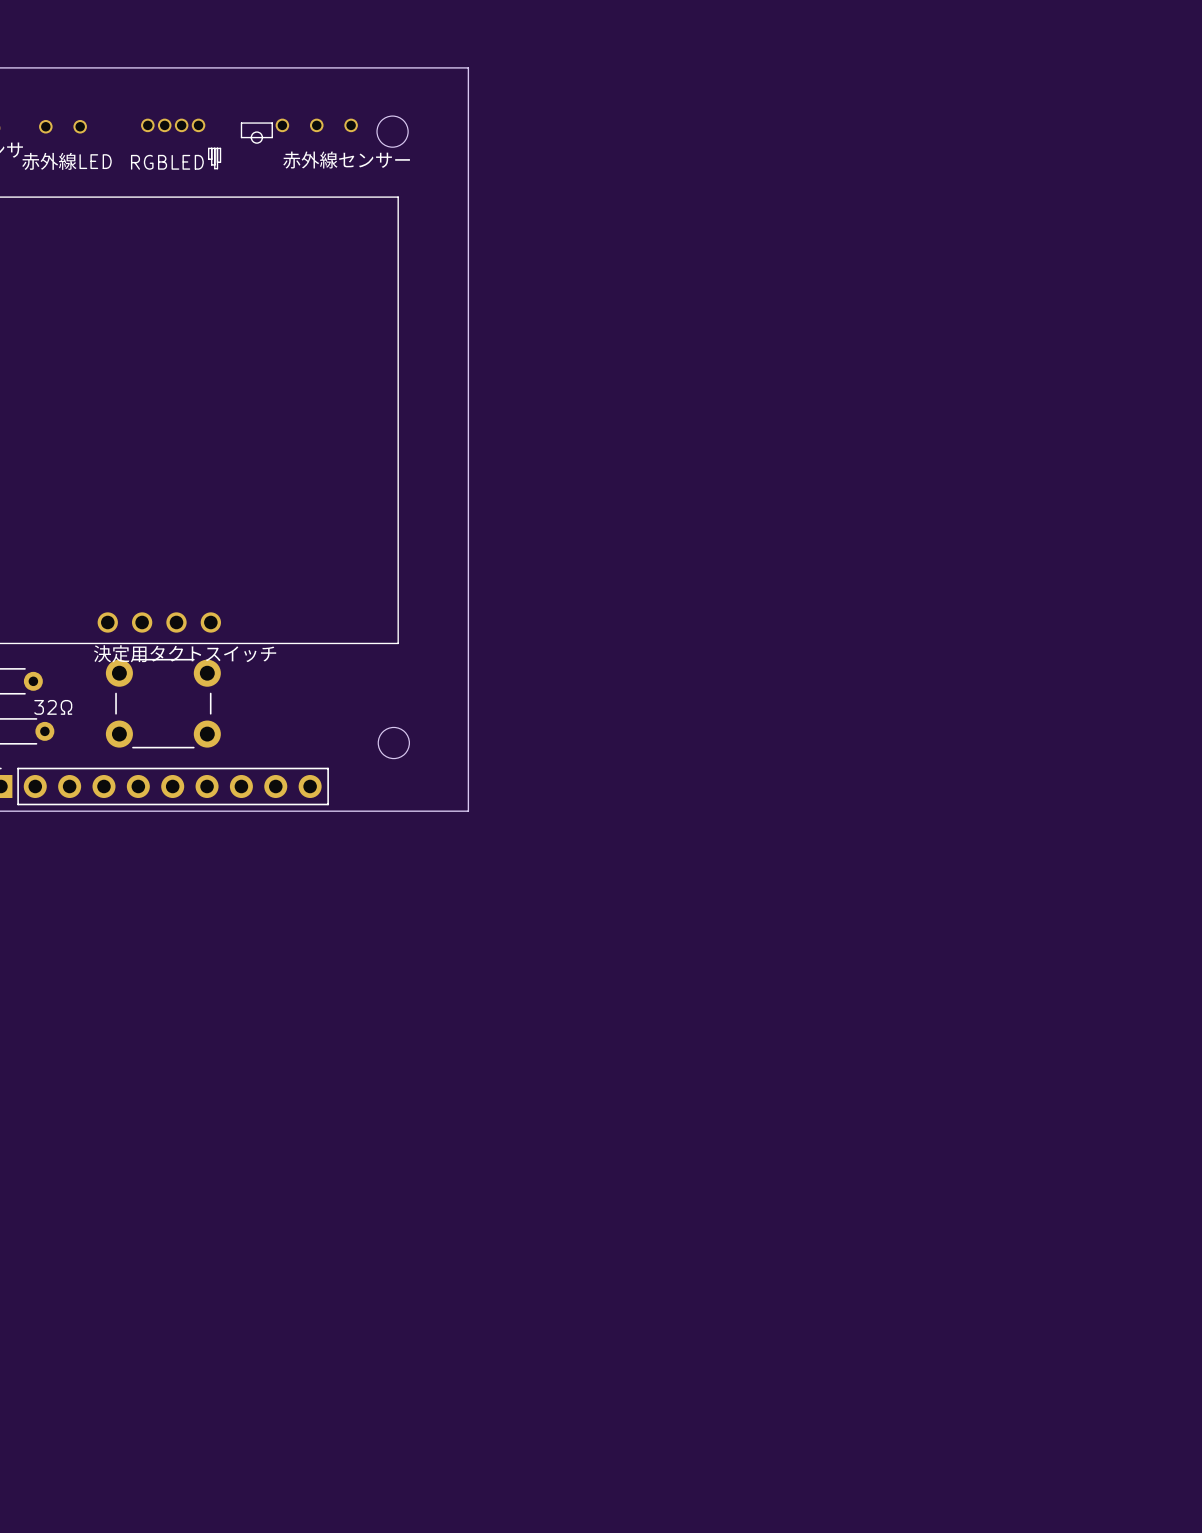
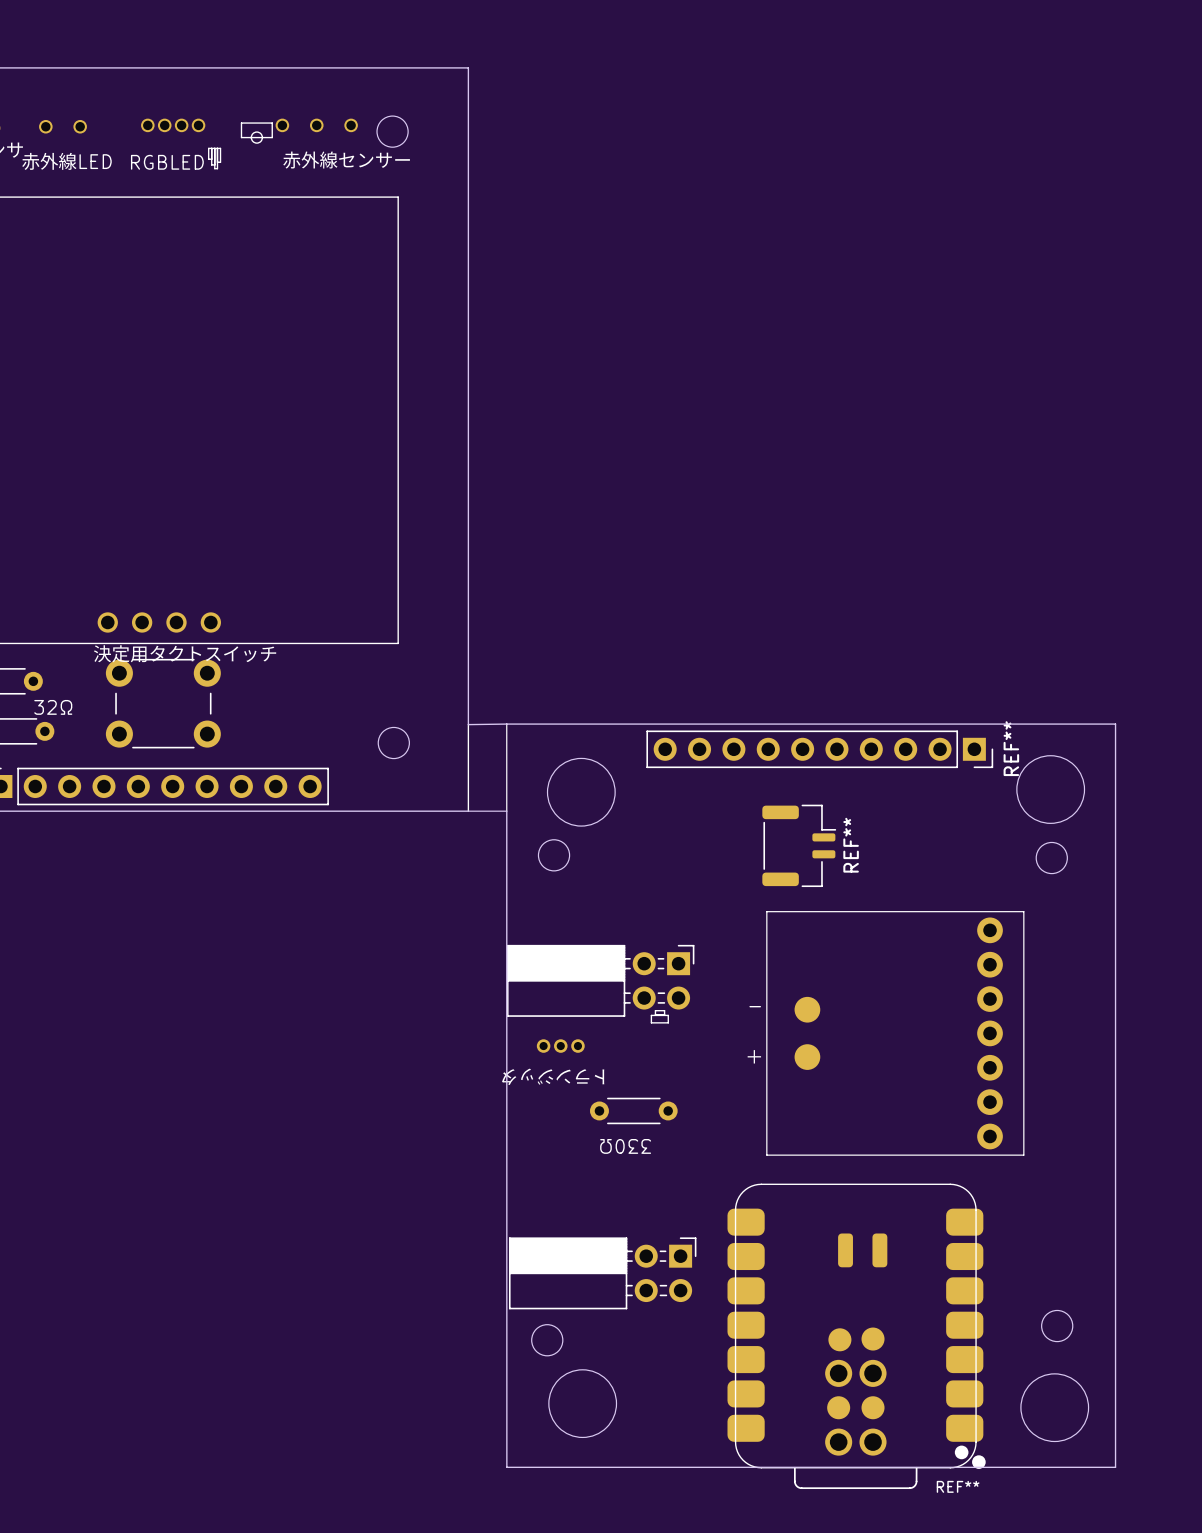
line: none -> (468, 724) (468, 811)
board edge: (468, 724) (468, 811) -> (468, 724) (1115, 724) (1115, 1467) (506, 1467) (506, 811) (468, 811)
line: none -> (506, 724) (506, 811)
REF**: none -> (819, 749)
round board edge: none -> [1016, 755, 1085, 824]
round board edge: none -> [547, 758, 616, 827]
round board edge: none -> [538, 839, 570, 872]
round board edge: none -> [1035, 842, 1068, 874]
REF**: none -> (799, 845)
line: none -> (766, 911) (1023, 911) (1023, 1155) (766, 1155) (766, 911)
part: none -> (990, 930)
part: none -> (990, 964)
part: none -> (600, 980)
part: none -> (990, 999)
text: none -> - (755, 1006)
part: none -> (807, 1009)
line: none -> (655, 1010) (664, 1010) (664, 1014) (655, 1014) (655, 1010)
line: none -> (651, 1015) (668, 1015) (668, 1022) (651, 1022) (651, 1015)
part: none -> (990, 1033)
part: none -> (543, 1046)
part: none -> (560, 1046)
part: none -> (577, 1046)
text: none -> ＋ (754, 1056)
part: none -> (807, 1057)
part: none -> (990, 1067)
text: none -> トランジッタ (553, 1076)
part: none -> (990, 1102)
part: none -> (633, 1110)
part: none -> (990, 1136)
text: none -> 330Ω (625, 1146)
part: none -> (602, 1273)
round board edge: none -> [1041, 1310, 1074, 1342]
round board edge: none -> [531, 1324, 564, 1357]
REF**: none -> (856, 1336)
round board edge: none -> [548, 1369, 617, 1438]
round board edge: none -> [1020, 1373, 1089, 1442]

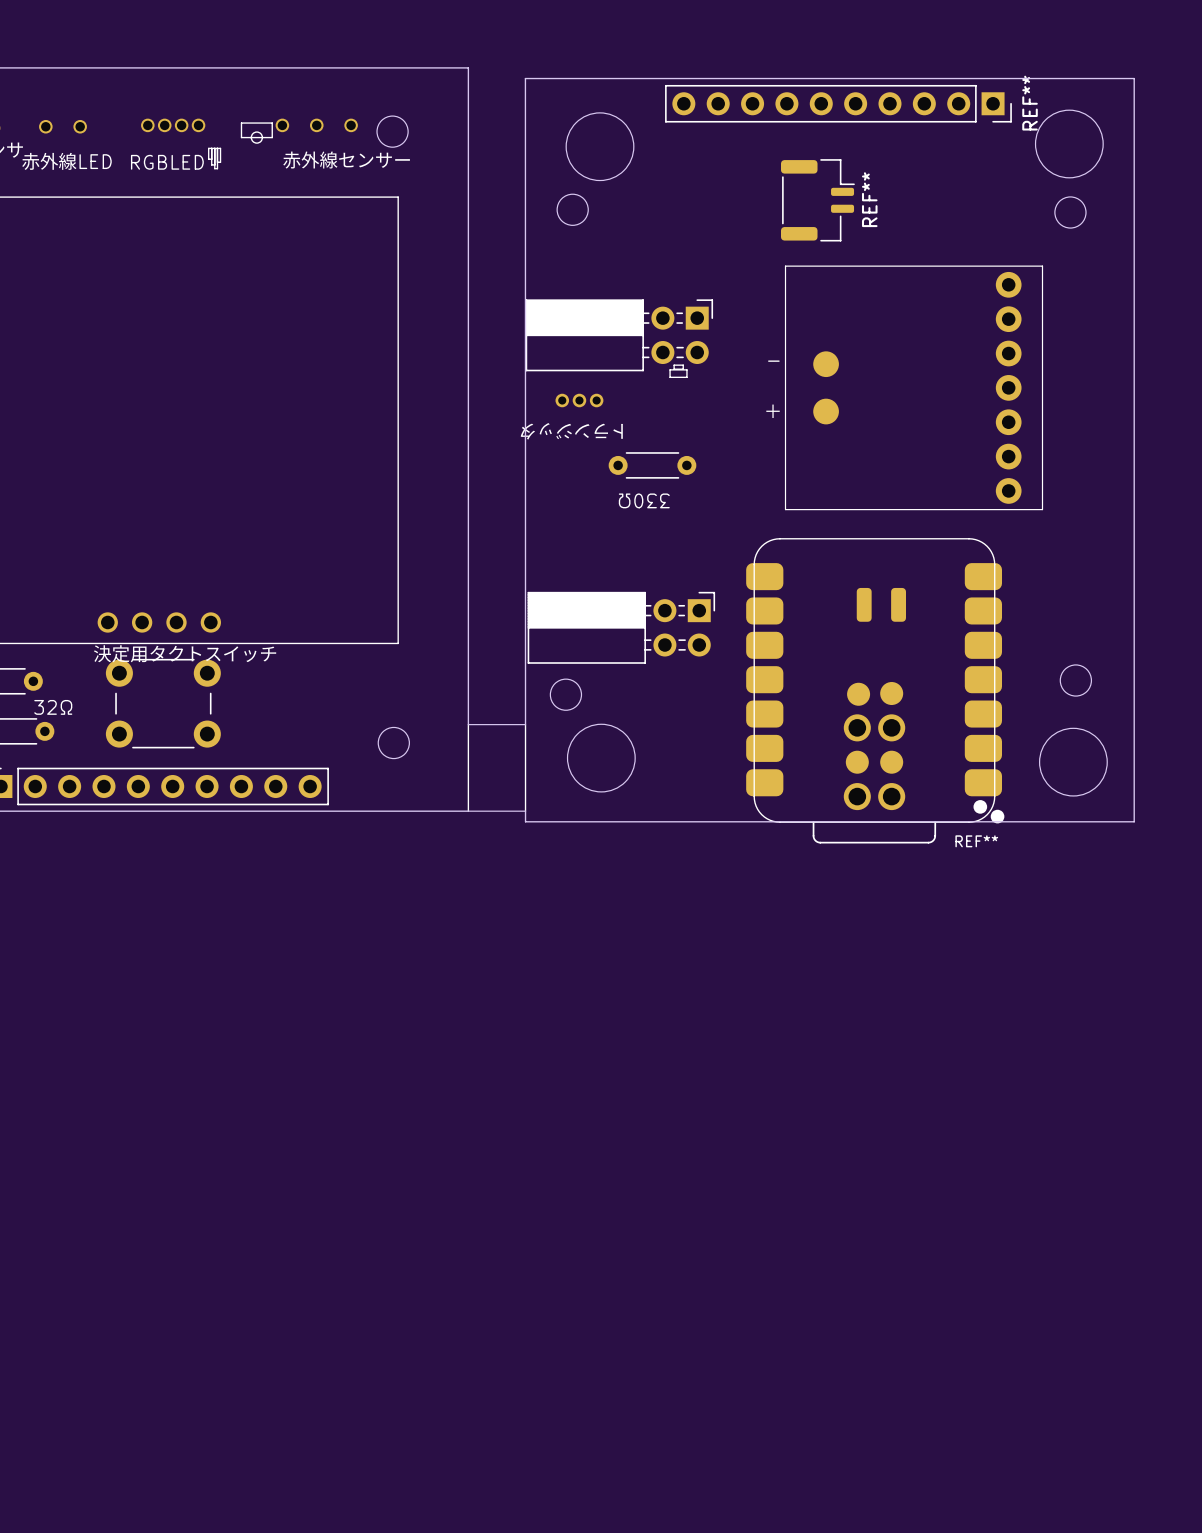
REF**: none -> (838, 103)
round board edge: none -> [1035, 109, 1104, 179]
round board edge: none -> [565, 112, 635, 181]
round board edge: none -> [556, 193, 589, 226]
round board edge: none -> [1054, 196, 1087, 229]
REF**: none -> (817, 200)
line: none -> (785, 266) (1042, 266) (1042, 509) (785, 509) (785, 266)
part: none -> (1008, 284)
part: none -> (1008, 319)
part: none -> (619, 335)
part: none -> (1008, 353)
text: none -> - (773, 361)
part: none -> (826, 364)
line: none -> (674, 365) (683, 365) (683, 369) (674, 369) (674, 365)
line: none -> (670, 369) (686, 369) (686, 377) (670, 377) (670, 369)
part: none -> (1008, 387)
part: none -> (562, 400)
part: none -> (579, 400)
part: none -> (596, 400)
text: none -> ＋ (773, 411)
part: none -> (826, 411)
part: none -> (1008, 422)
text: none -> トランジッタ (571, 431)
part: none -> (1008, 456)
part: none -> (652, 465)
part: none -> (1008, 490)
text: none -> 330Ω (644, 500)
part: none -> (621, 627)
REF**: none -> (875, 690)
board edge: (468, 724) (1115, 724) (1115, 1467) (506, 1467) (506, 811) -> (468, 724) (525, 724) (525, 78) (1134, 78) (1134, 821) (525, 821) (525, 811) (506, 811)
line: (506, 724) (506, 811) -> none
line: none -> (525, 724) (525, 811)
REF**: (819, 749) -> none
round board edge position: (1050, 789) -> (1073, 762)
round board edge position: (581, 792) -> (601, 758)
REF**: (799, 845) -> none
round board edge position: (554, 855) -> (565, 694)
round board edge position: (1051, 858) -> (1075, 680)
line: (766, 911) (1023, 911) (1023, 1155) (766, 1155) (766, 911) -> none
part: (990, 930) -> none
part: (990, 964) -> none
part: (600, 980) -> none
part: (990, 999) -> none
text: - (755, 1006) -> none
part: (807, 1009) -> none
line: (655, 1010) (664, 1010) (664, 1014) (655, 1014) (655, 1010) -> none
line: (651, 1015) (668, 1015) (668, 1022) (651, 1022) (651, 1015) -> none
part: (990, 1033) -> none
part: (543, 1046) -> none
part: (560, 1046) -> none
part: (577, 1046) -> none
text: ＋ (754, 1056) -> none
part: (807, 1057) -> none
part: (990, 1067) -> none
text: トランジッタ (553, 1076) -> none
part: (990, 1102) -> none
part: (633, 1110) -> none
part: (990, 1136) -> none
text: 330Ω (625, 1146) -> none
part: (602, 1273) -> none
round board edge: [1041, 1310, 1074, 1342] -> none
round board edge: [531, 1324, 564, 1357] -> none
REF**: (856, 1336) -> none
round board edge: [548, 1369, 617, 1438] -> none
round board edge: [1020, 1373, 1089, 1442] -> none

